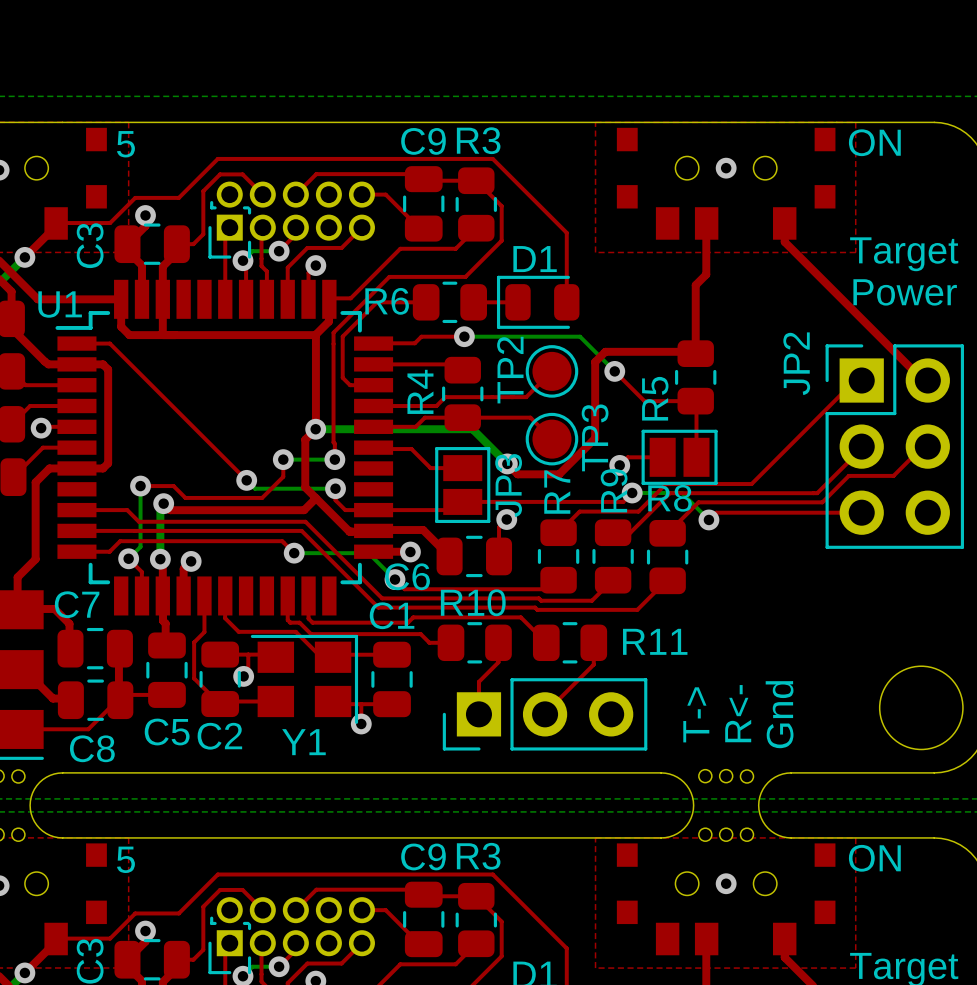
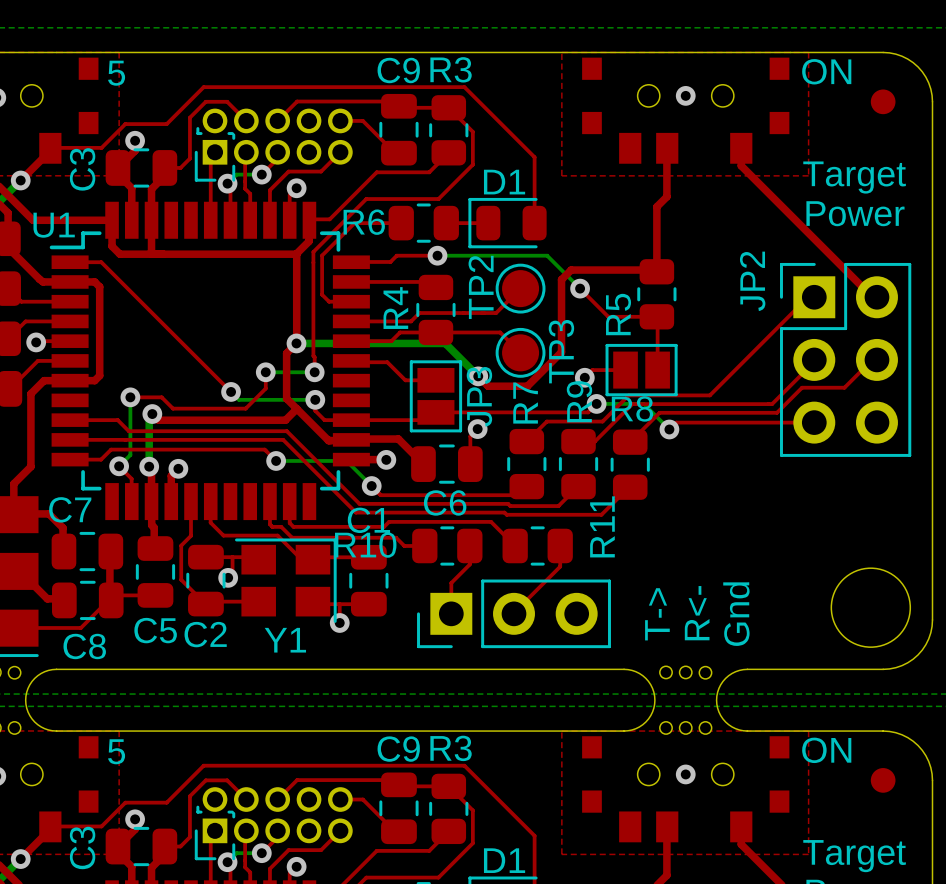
part: none -> (883, 101)
C6 name position: C6 (407, 576) -> C6 (445, 502)
R10 name position: R10 (473, 602) -> R10 (365, 545)
R11 name rotation: 0° (655, 641) -> 90° counterclockwise (602, 526)
part: none -> (883, 780)

